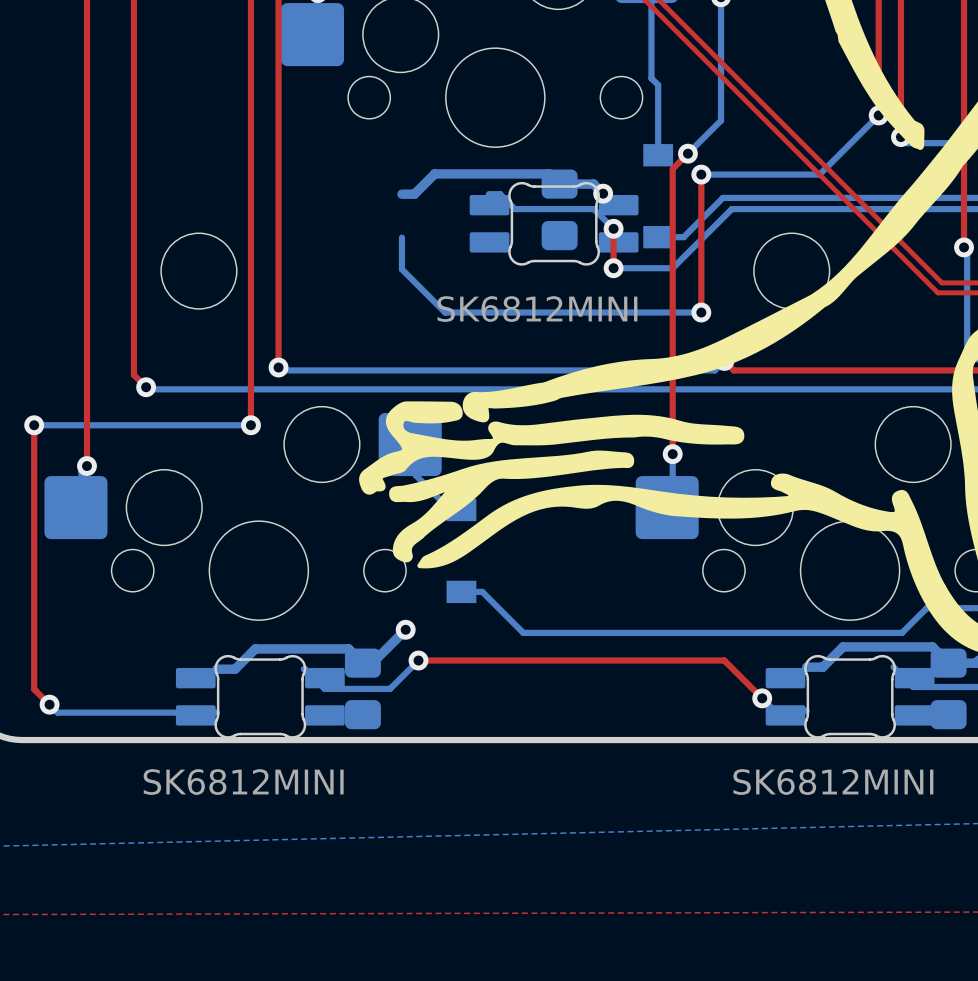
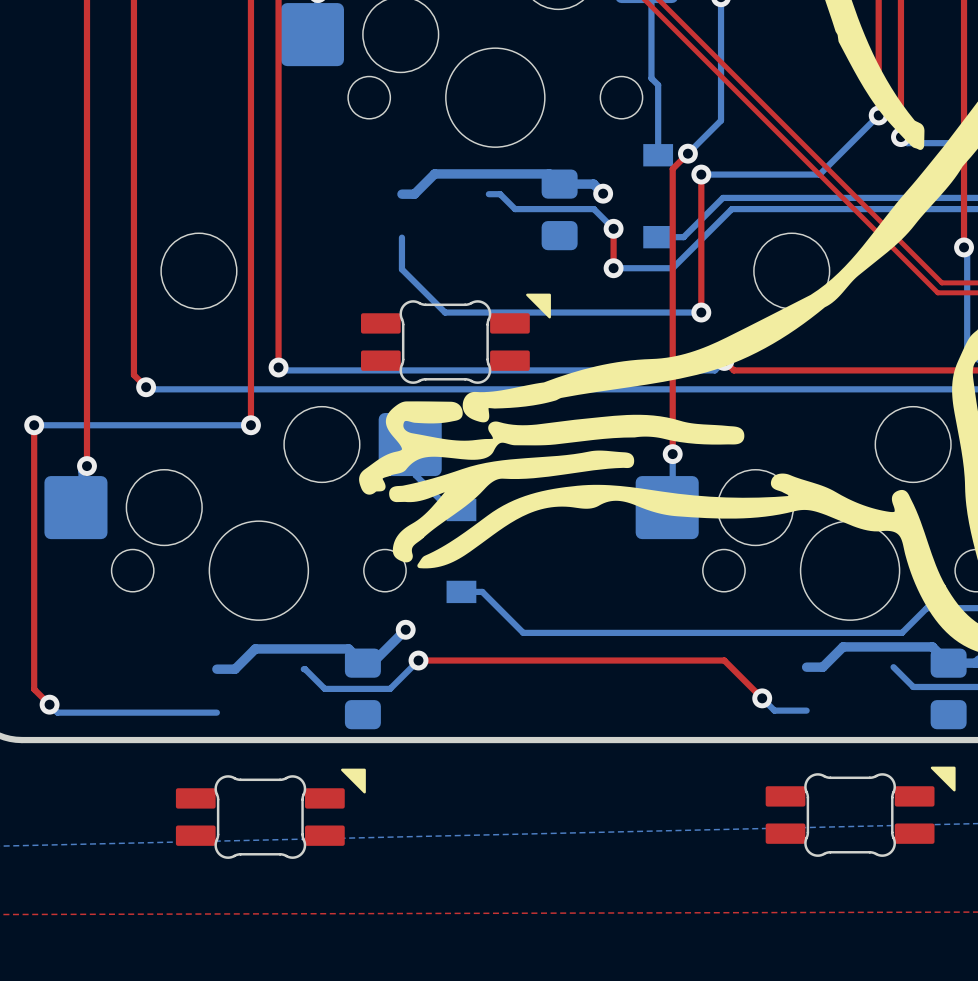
part side: top (554, 223) -> bottom (455, 338)
part side: top (260, 696) -> bottom (270, 813)
part side: top (850, 696) -> bottom (860, 811)

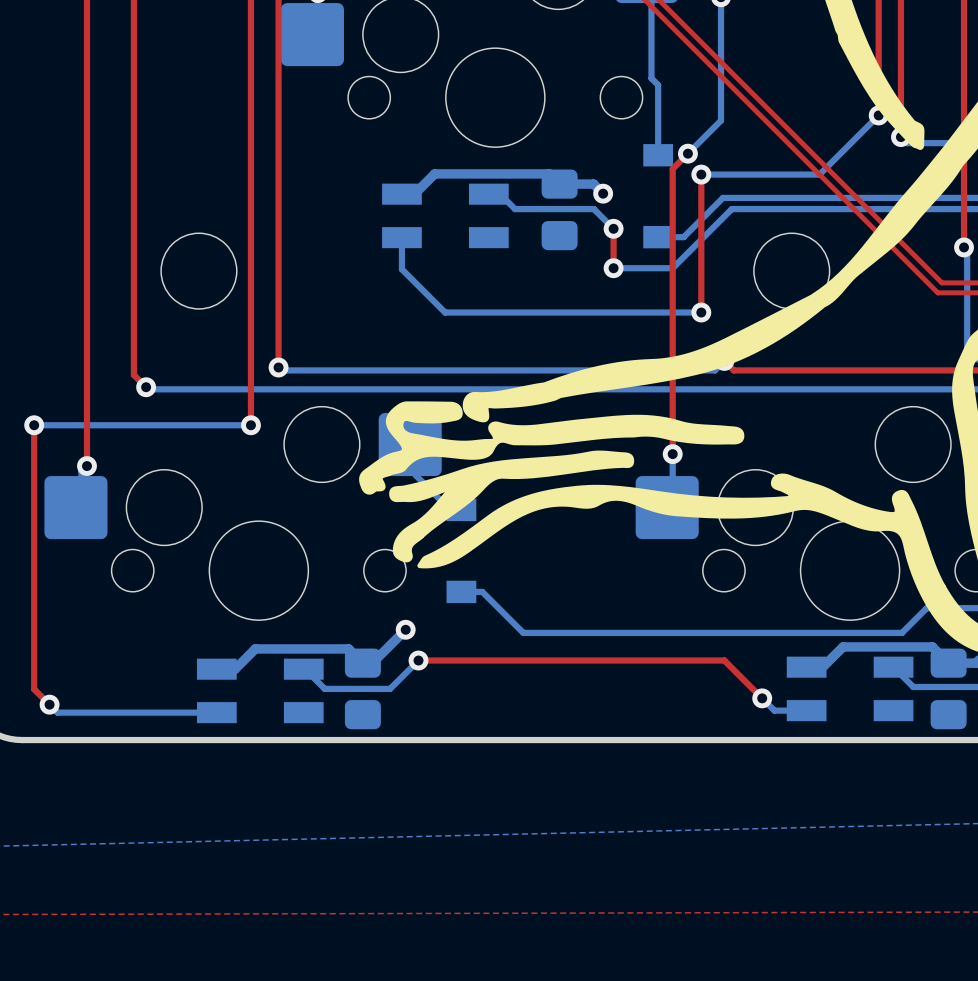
part: none -> (445, 215)
part: (455, 338) -> none
part: none -> (850, 688)
part: none -> (260, 690)
part: (860, 811) -> none
part: (270, 813) -> none

